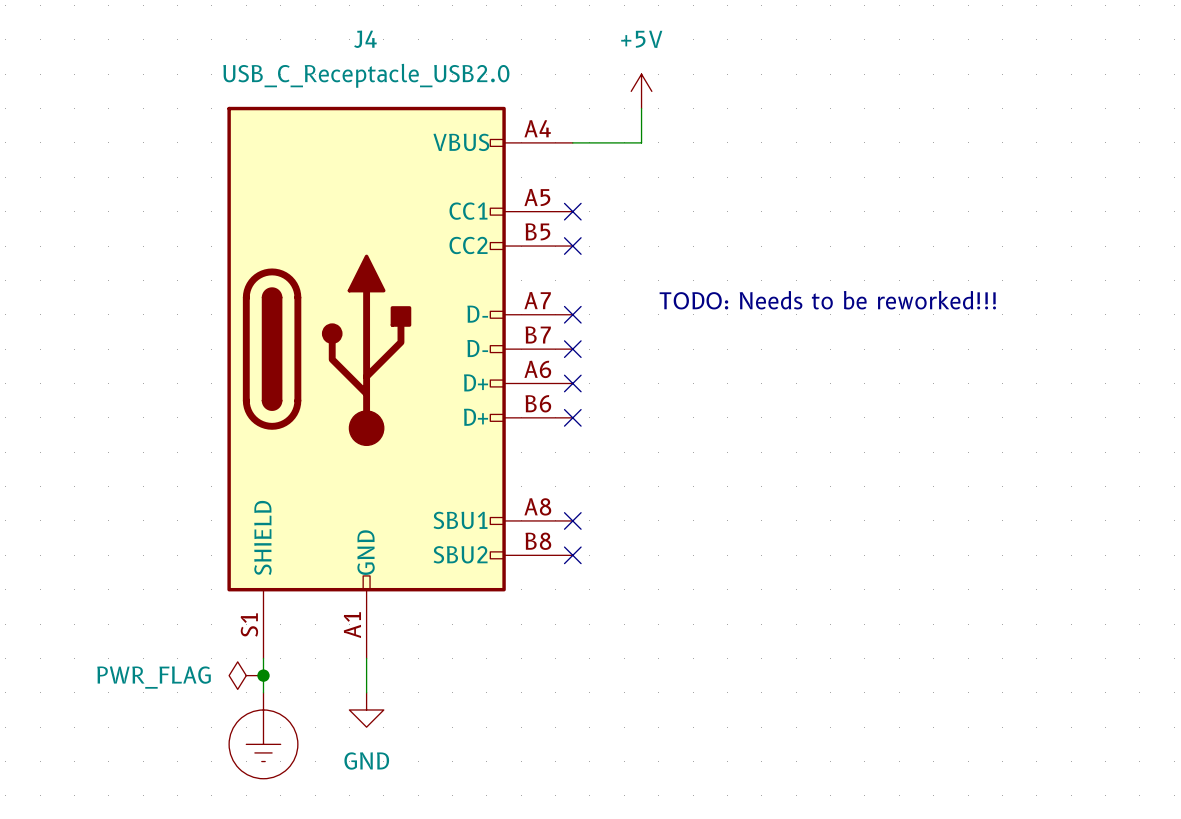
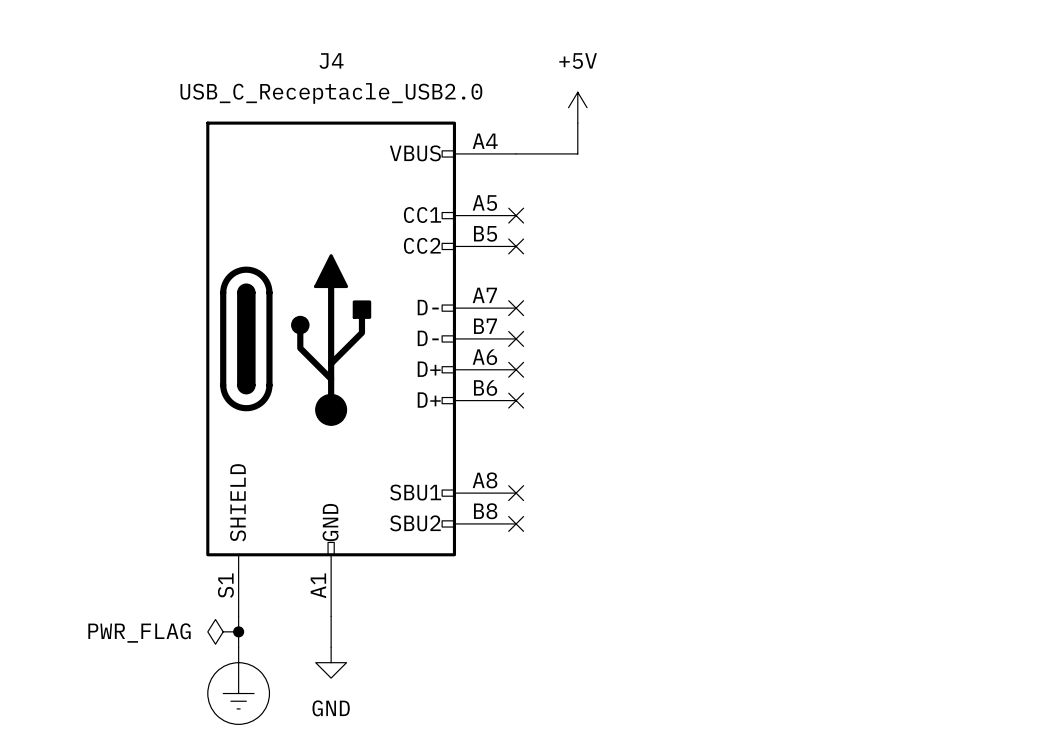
text: TODO: Needs to be reworked!!! (827, 300) -> none

